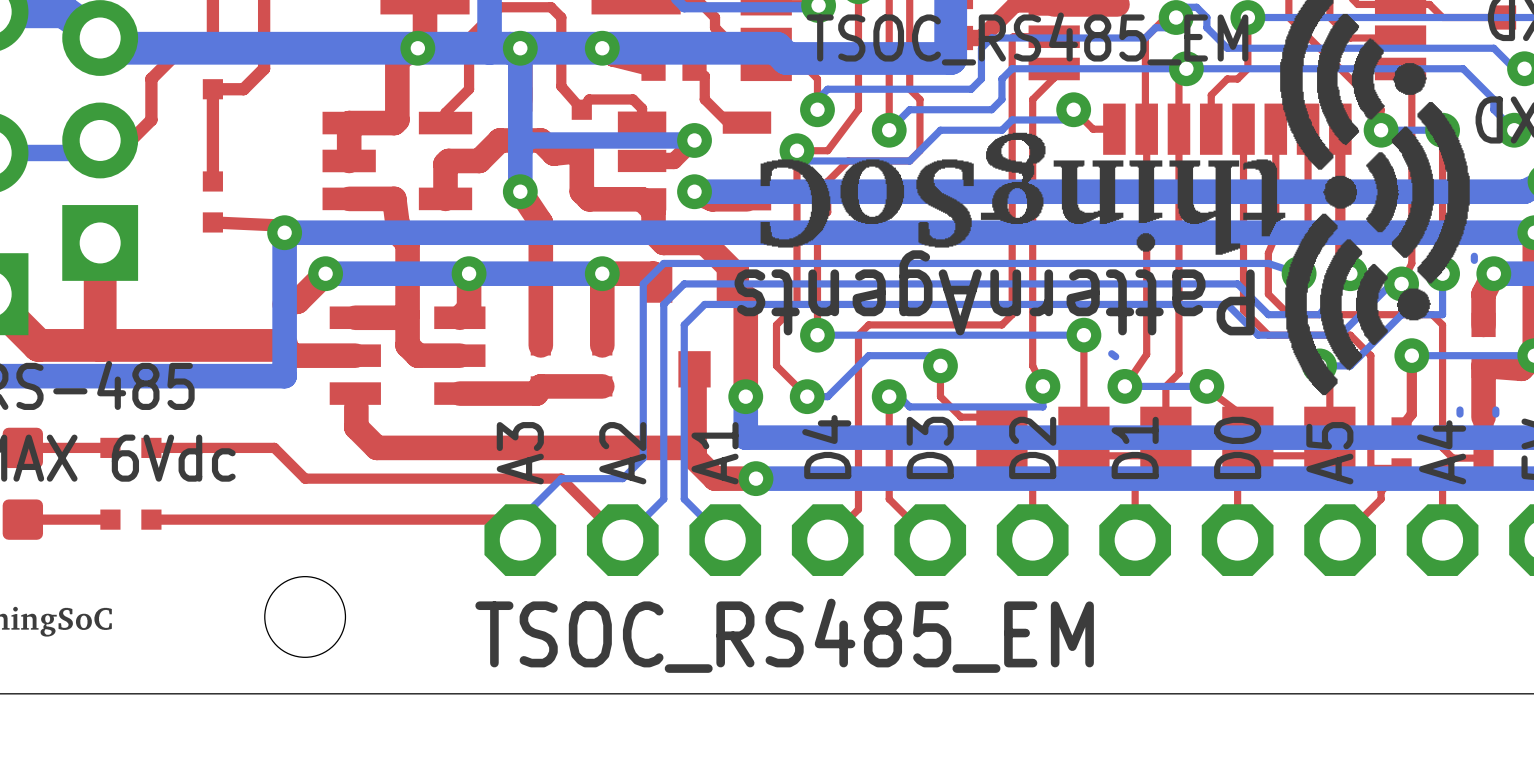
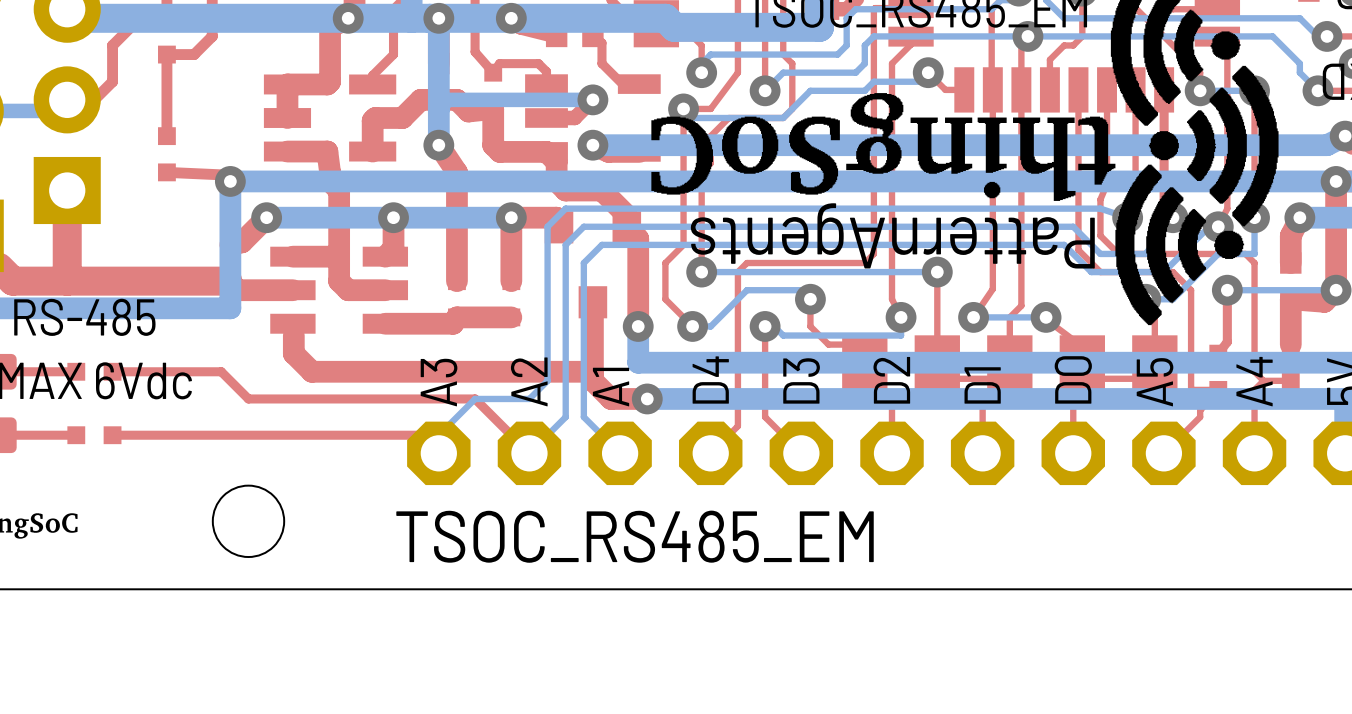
bottom track: (1474, 256) (1474, 260) -> none
bottom track: (1111, 353) (1115, 356) -> none
bottom track: (1459, 409) (1459, 414) -> none
bottom track: (1495, 409) (1495, 414) -> none

